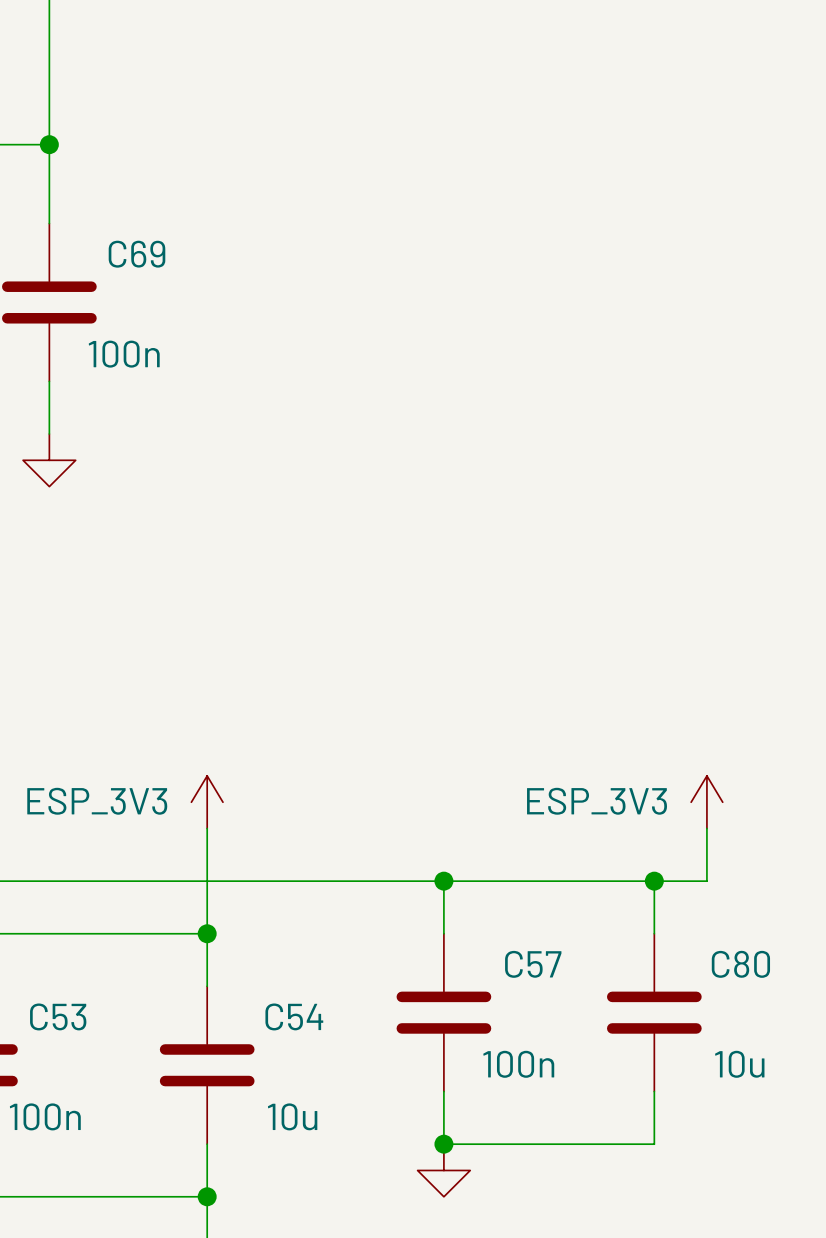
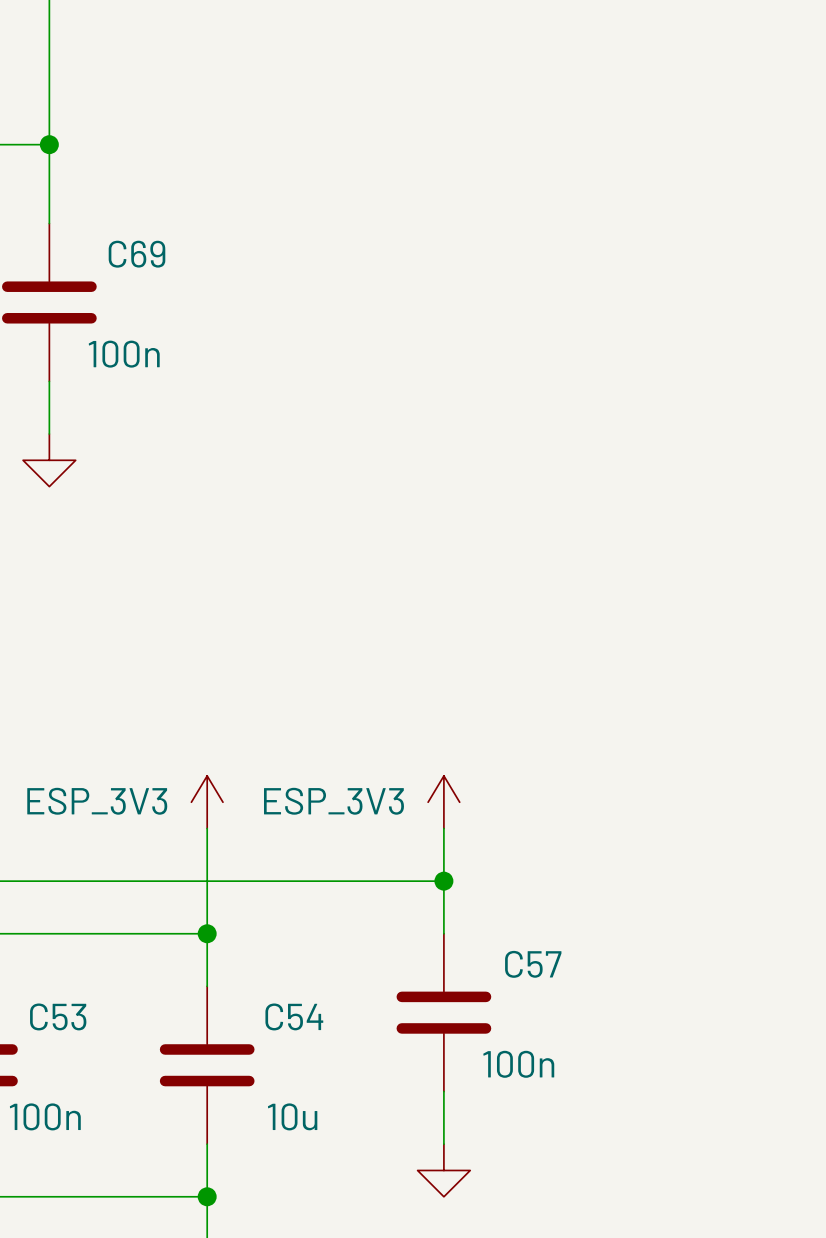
power symbol position: ESP_3V3 (706, 802) -> ESP_3V3 (443, 802)
wire: (706, 828) (706, 881) (443, 881) -> (443, 828) (443, 881)
wire: (654, 881) (654, 933) -> none
junction: (654, 881) -> none
C80: 10u (654, 1012) -> none
wire: (654, 1091) (654, 1144) (443, 1144) -> none
junction: (443, 1144) -> none

